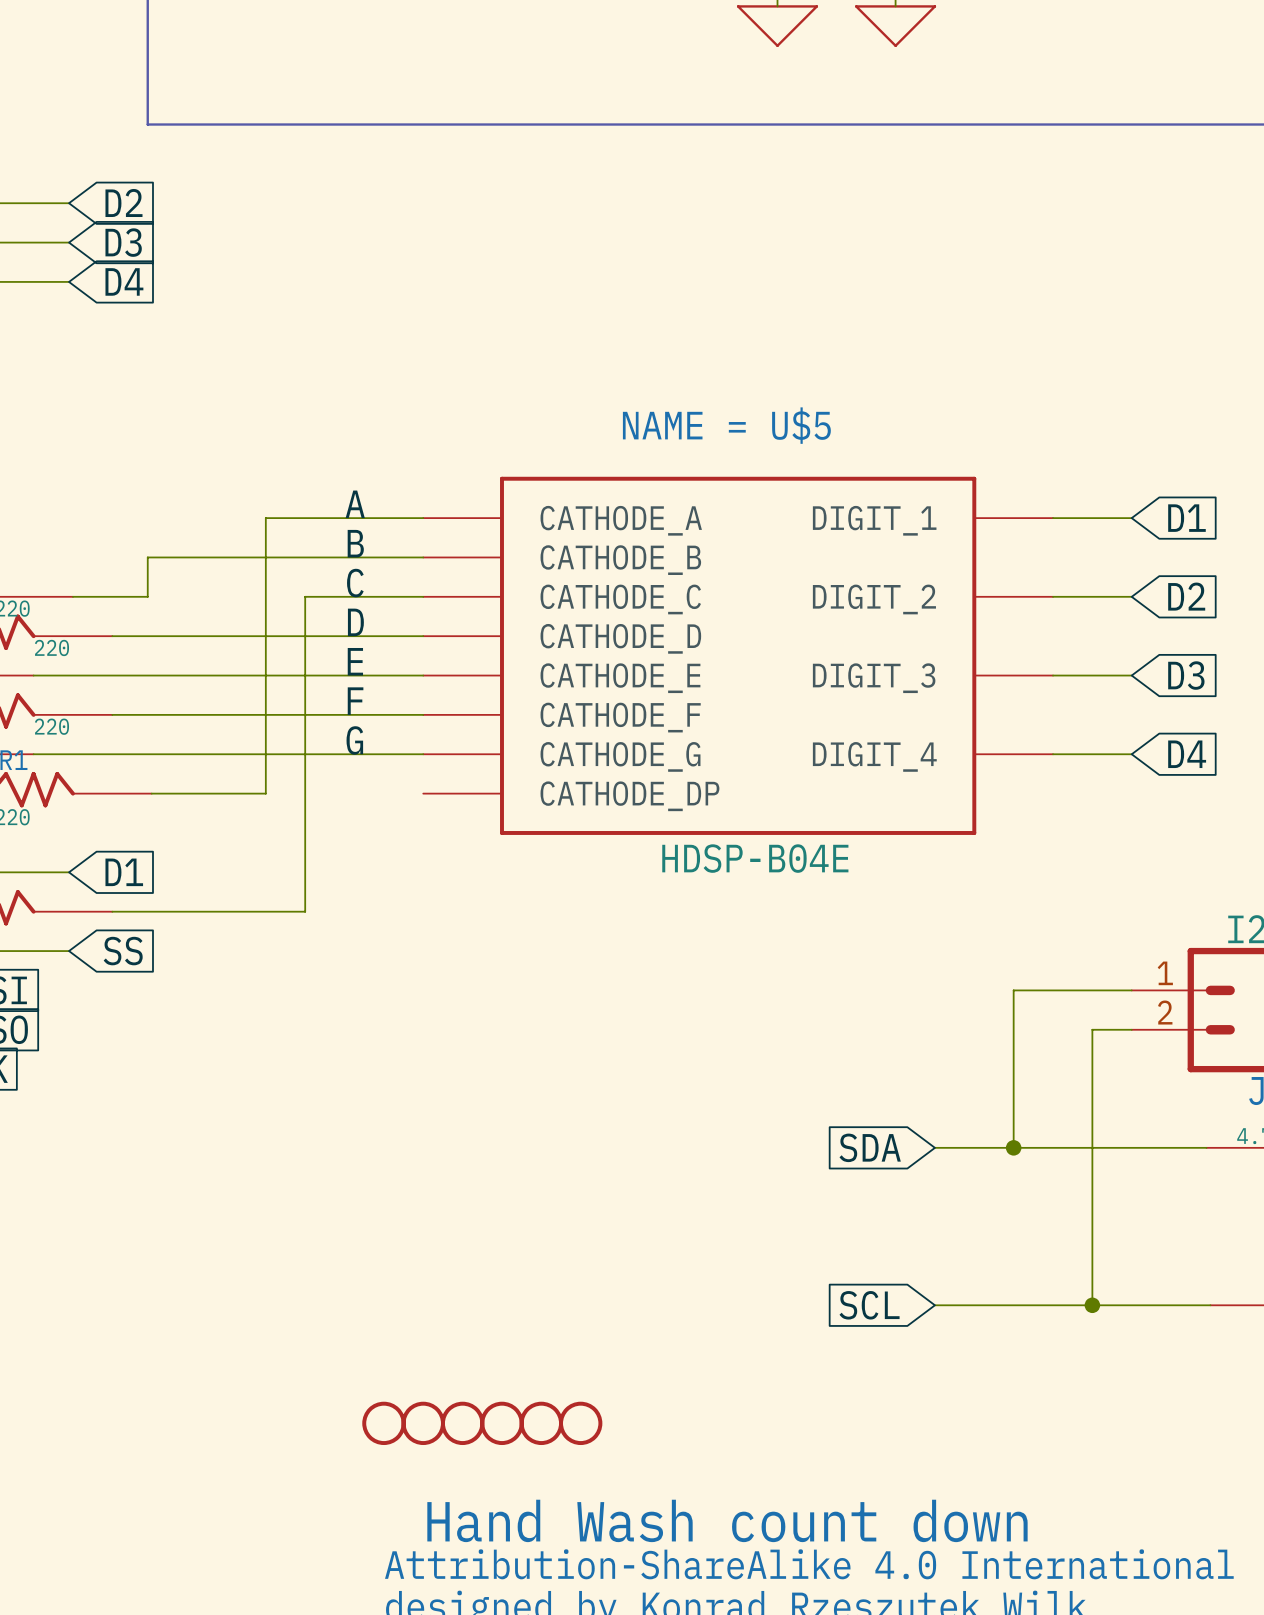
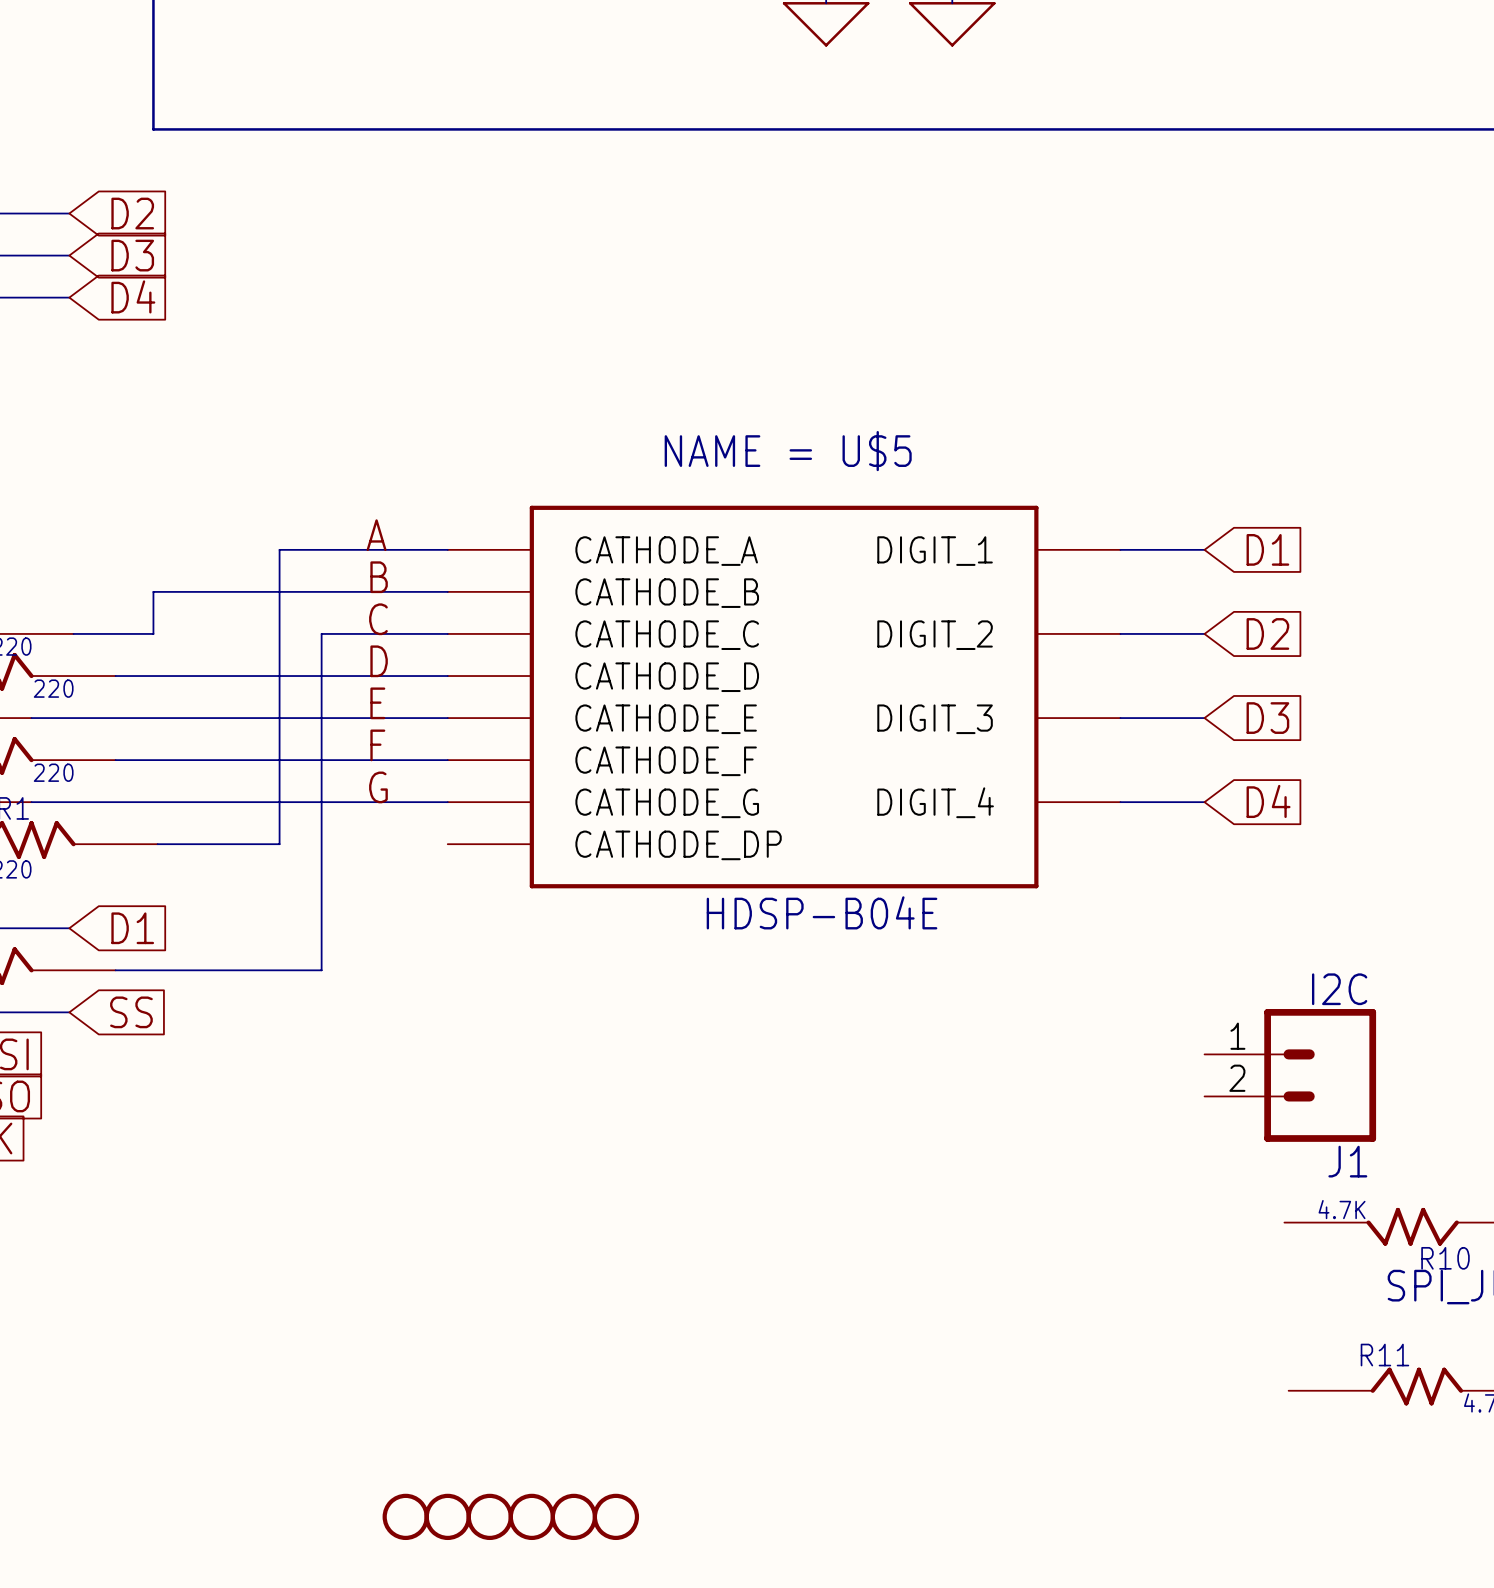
wire: (1131, 990) (1013, 990) (1013, 1147) -> none
wire: (1131, 1029) (1092, 1029) (1092, 1305) -> none
global label: SDA (870, 1147) -> none
wire: (934, 1147) (1206, 1147) -> none
junction: (1013, 1147) -> none
global label: SCL (869, 1305) -> none
wire: (934, 1305) (1210, 1305) -> none
junction: (1092, 1305) -> none

